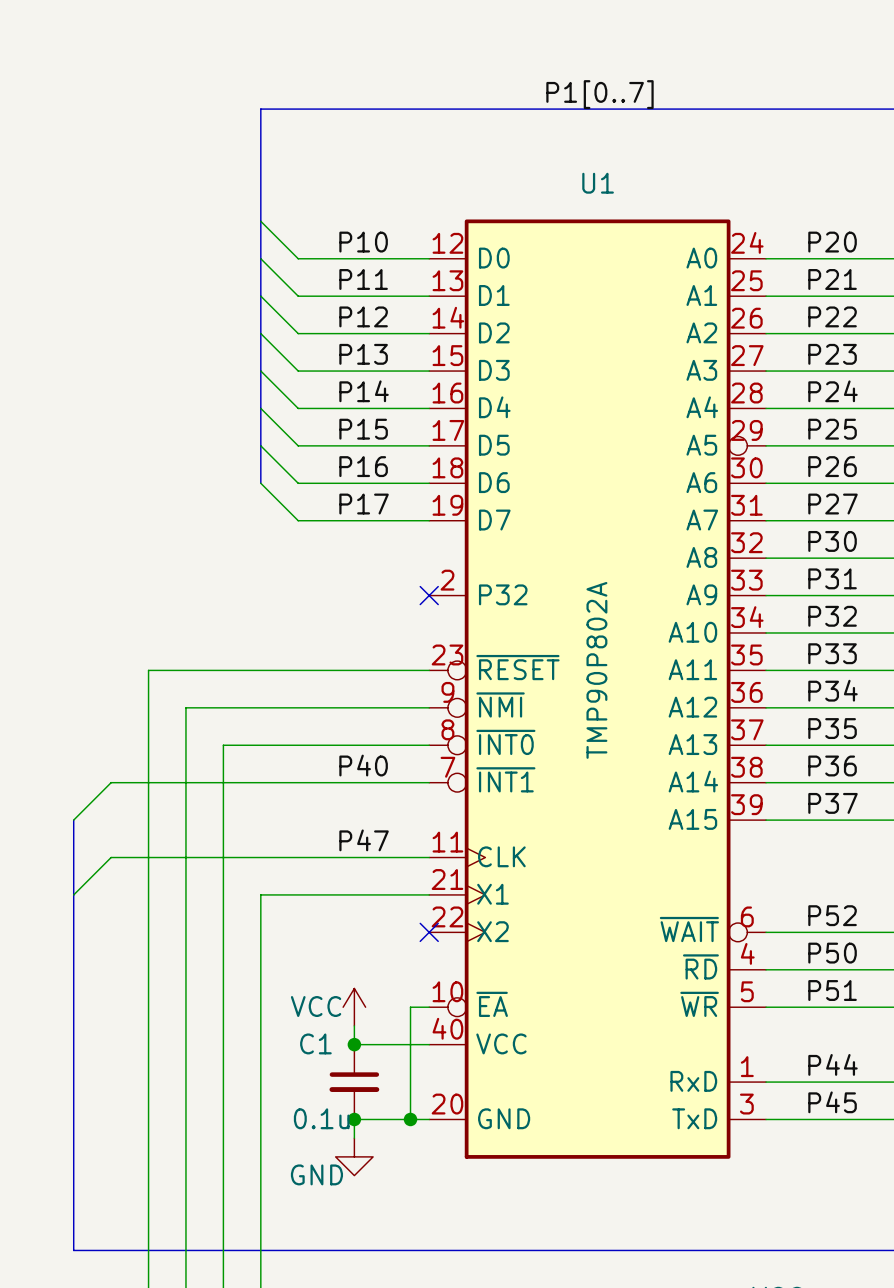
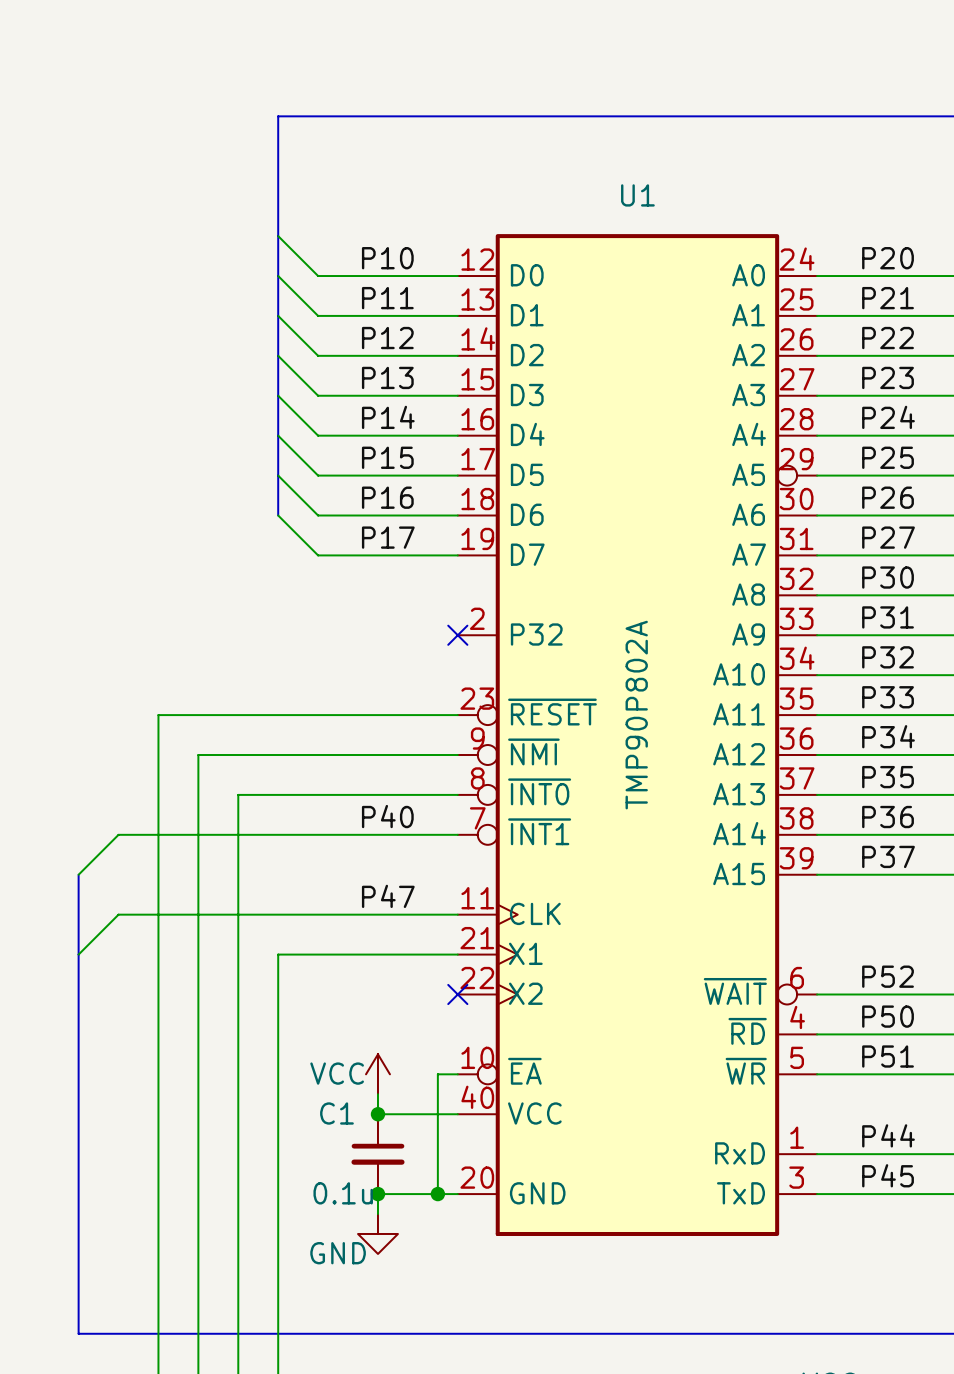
label: P1[0..7] (599, 94) -> none

